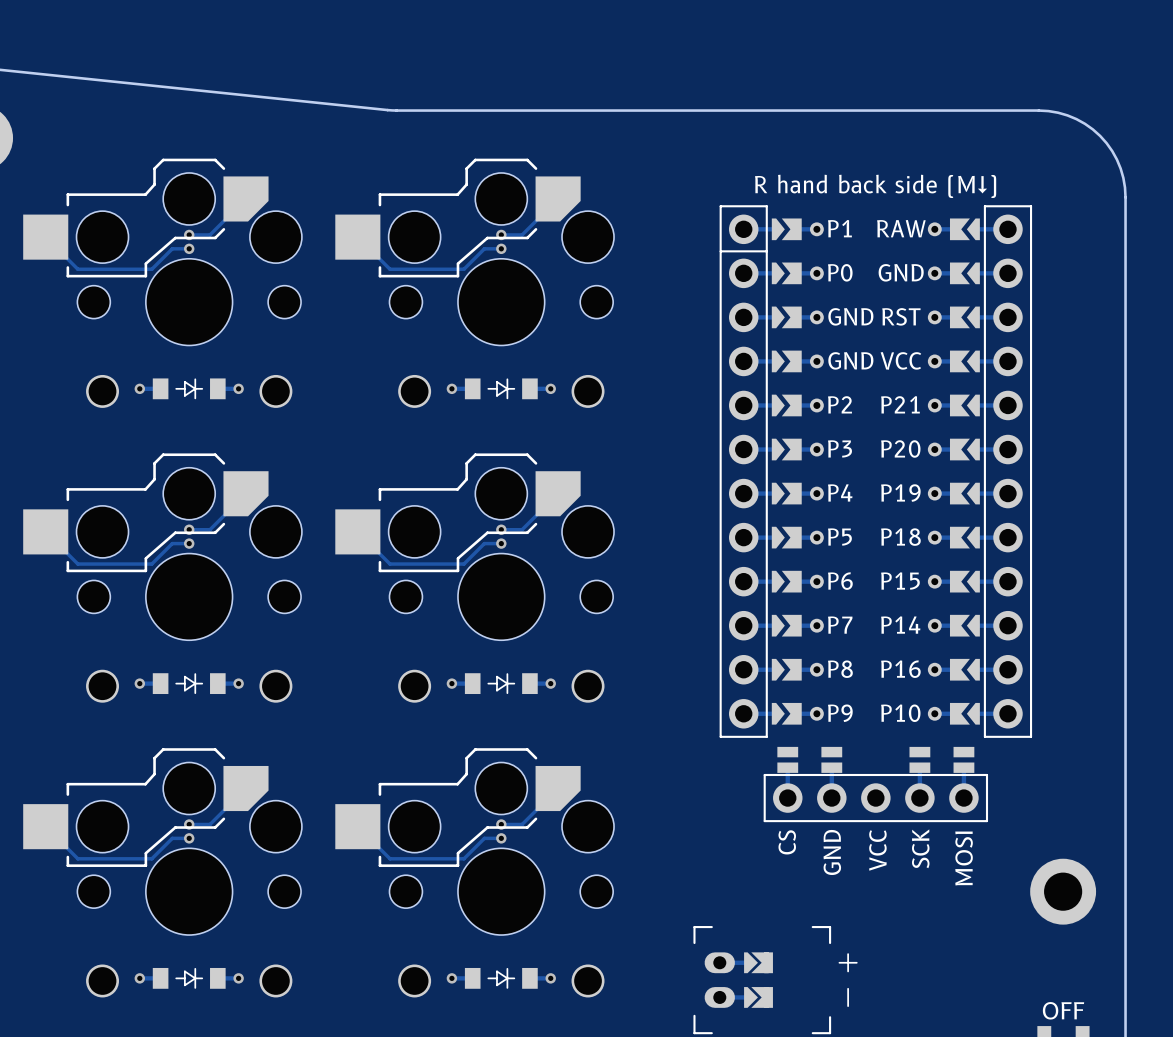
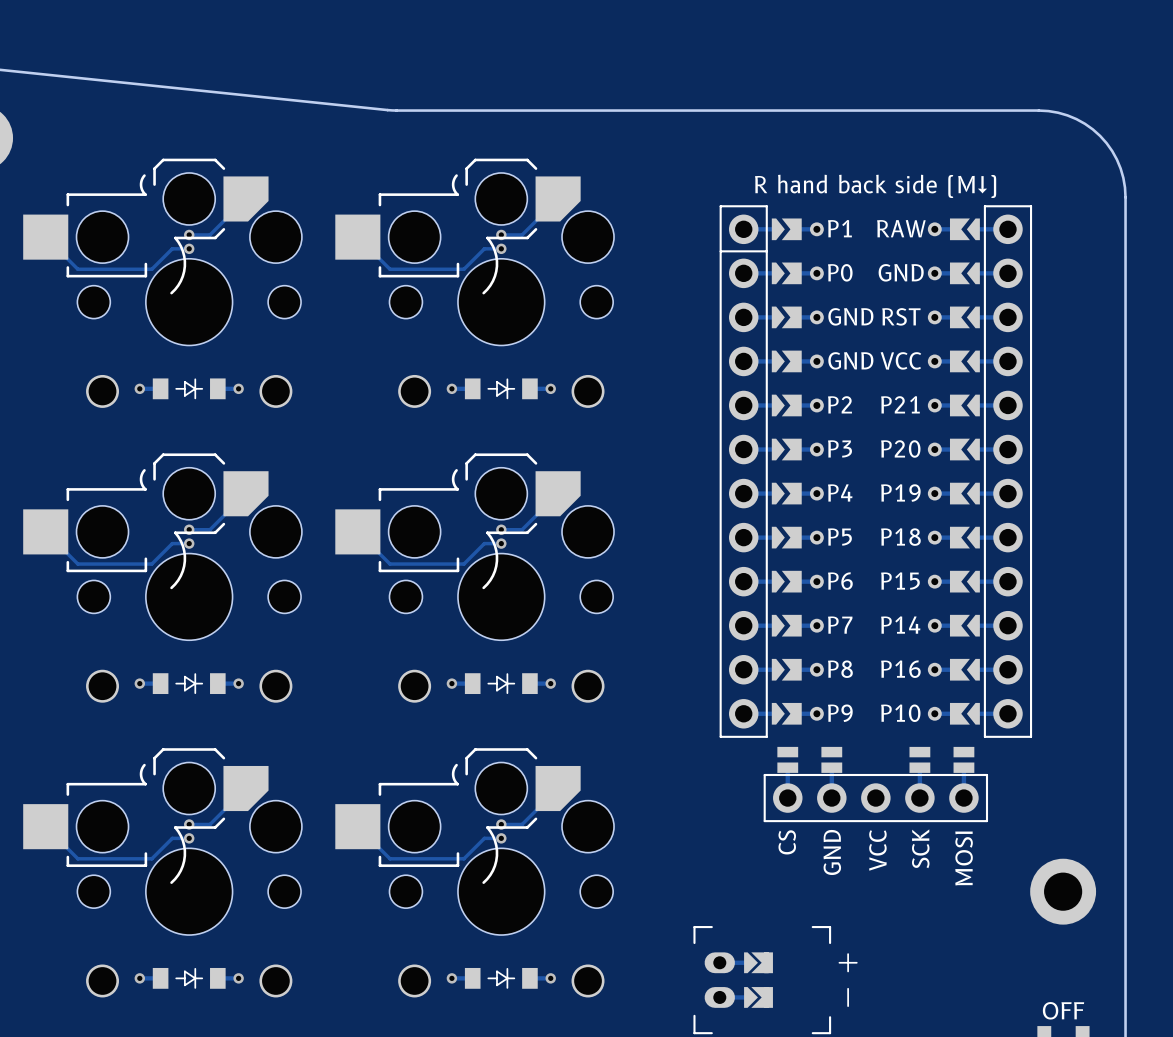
part footprint: [23, 158, 302, 408] -> [23, 158, 302, 408]
part footprint: [335, 158, 615, 408] -> [335, 158, 615, 408]
part footprint: [23, 453, 302, 703] -> [23, 453, 302, 703]
part footprint: [335, 453, 615, 703] -> [335, 453, 615, 703]
part footprint: [23, 748, 302, 998] -> [23, 748, 302, 998]
part footprint: [335, 748, 615, 998] -> [335, 748, 615, 998]

